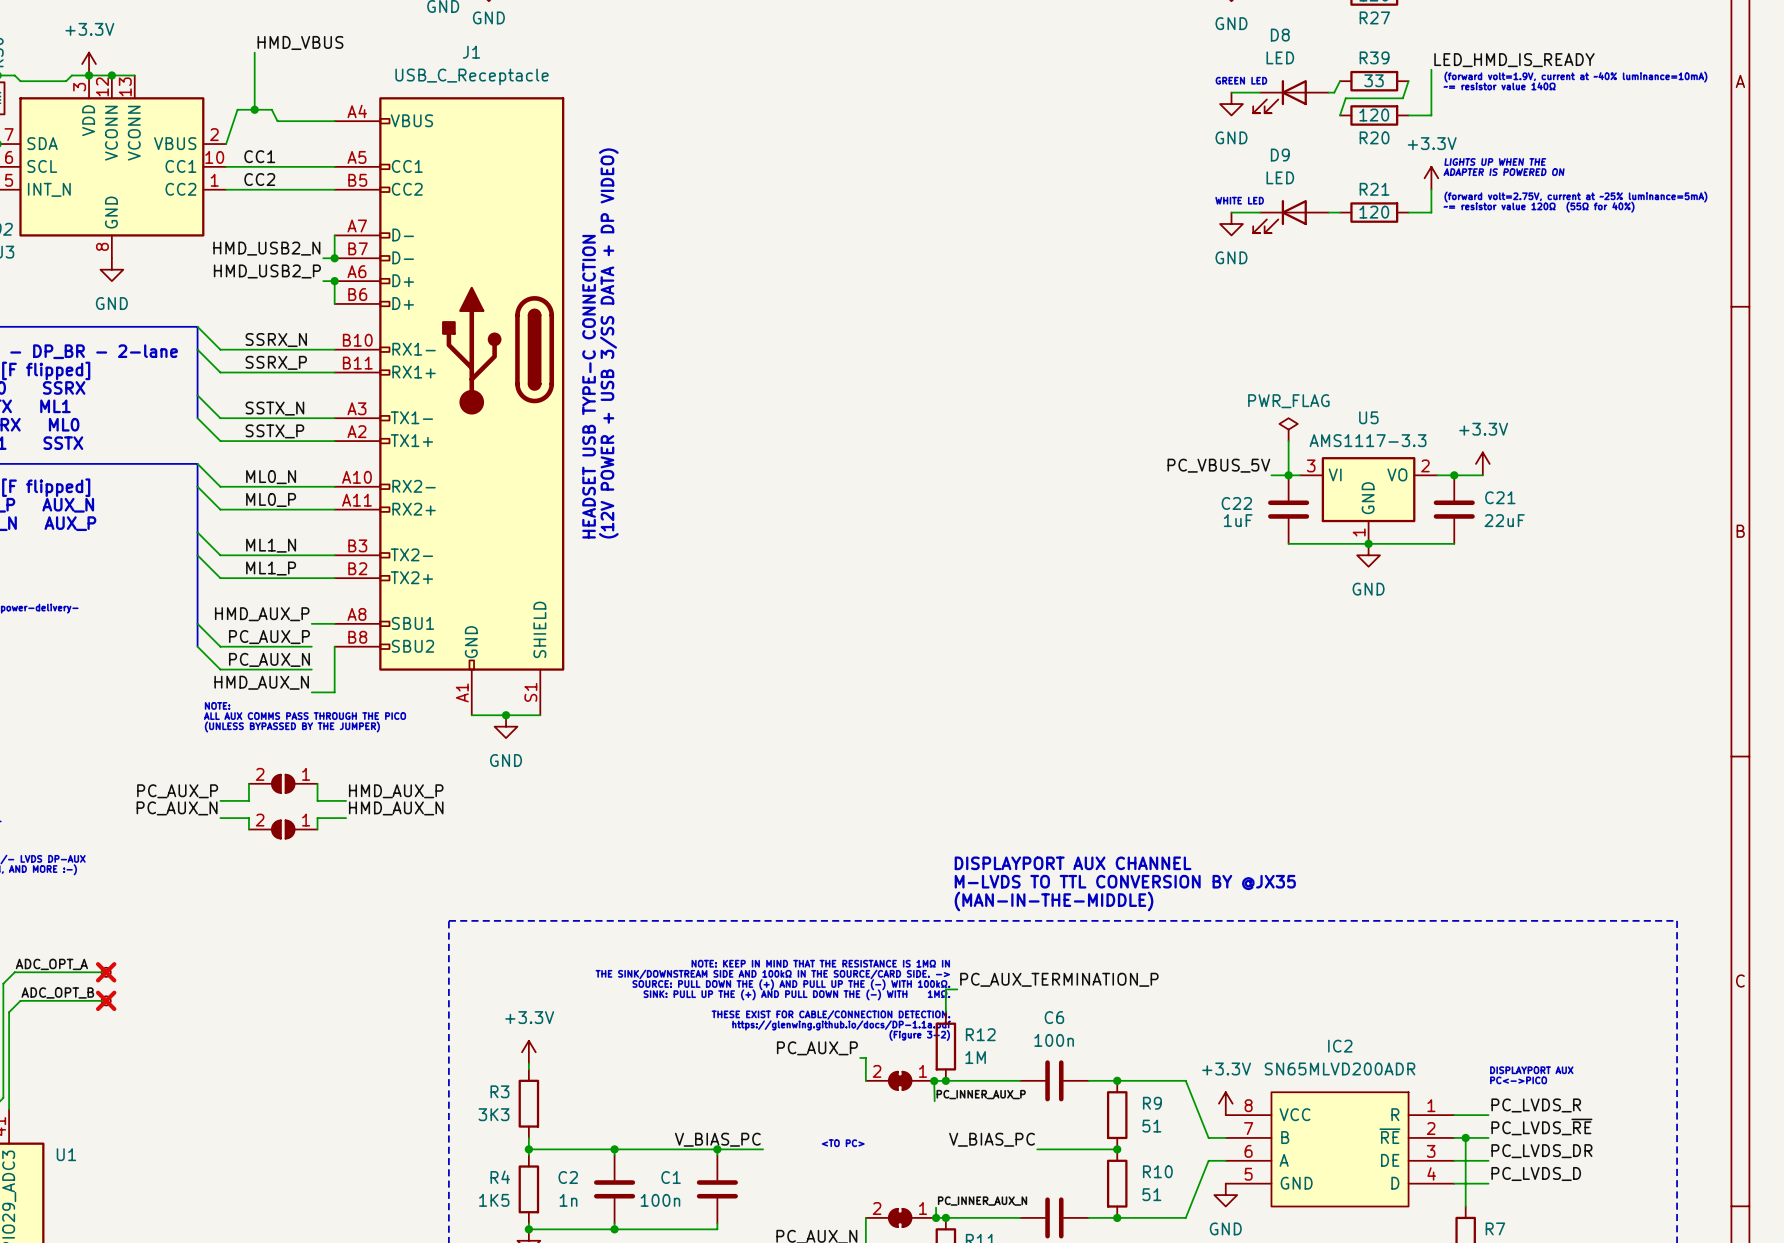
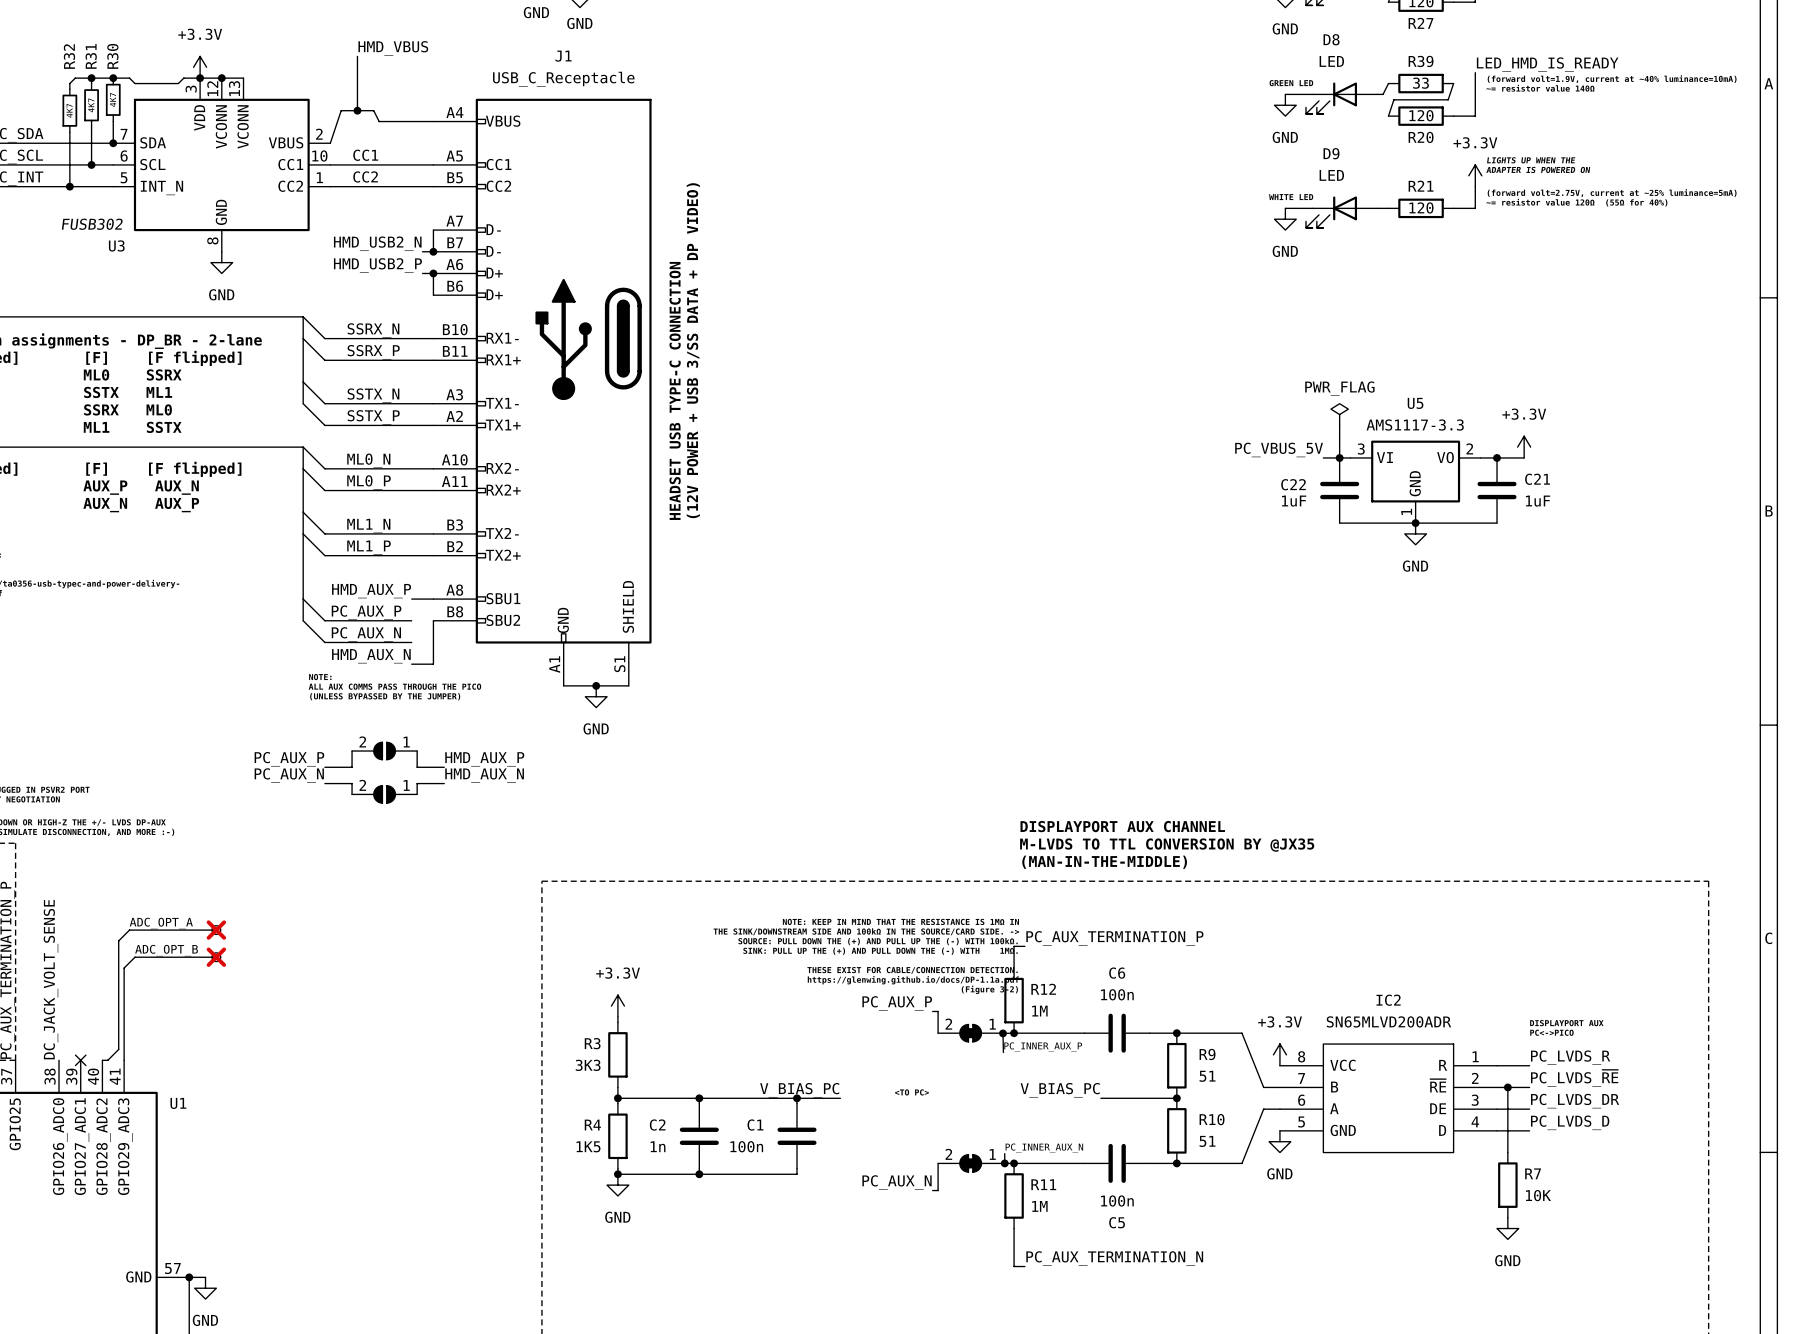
C21 value: 22uF (1504, 520) -> 1uF (1538, 501)

